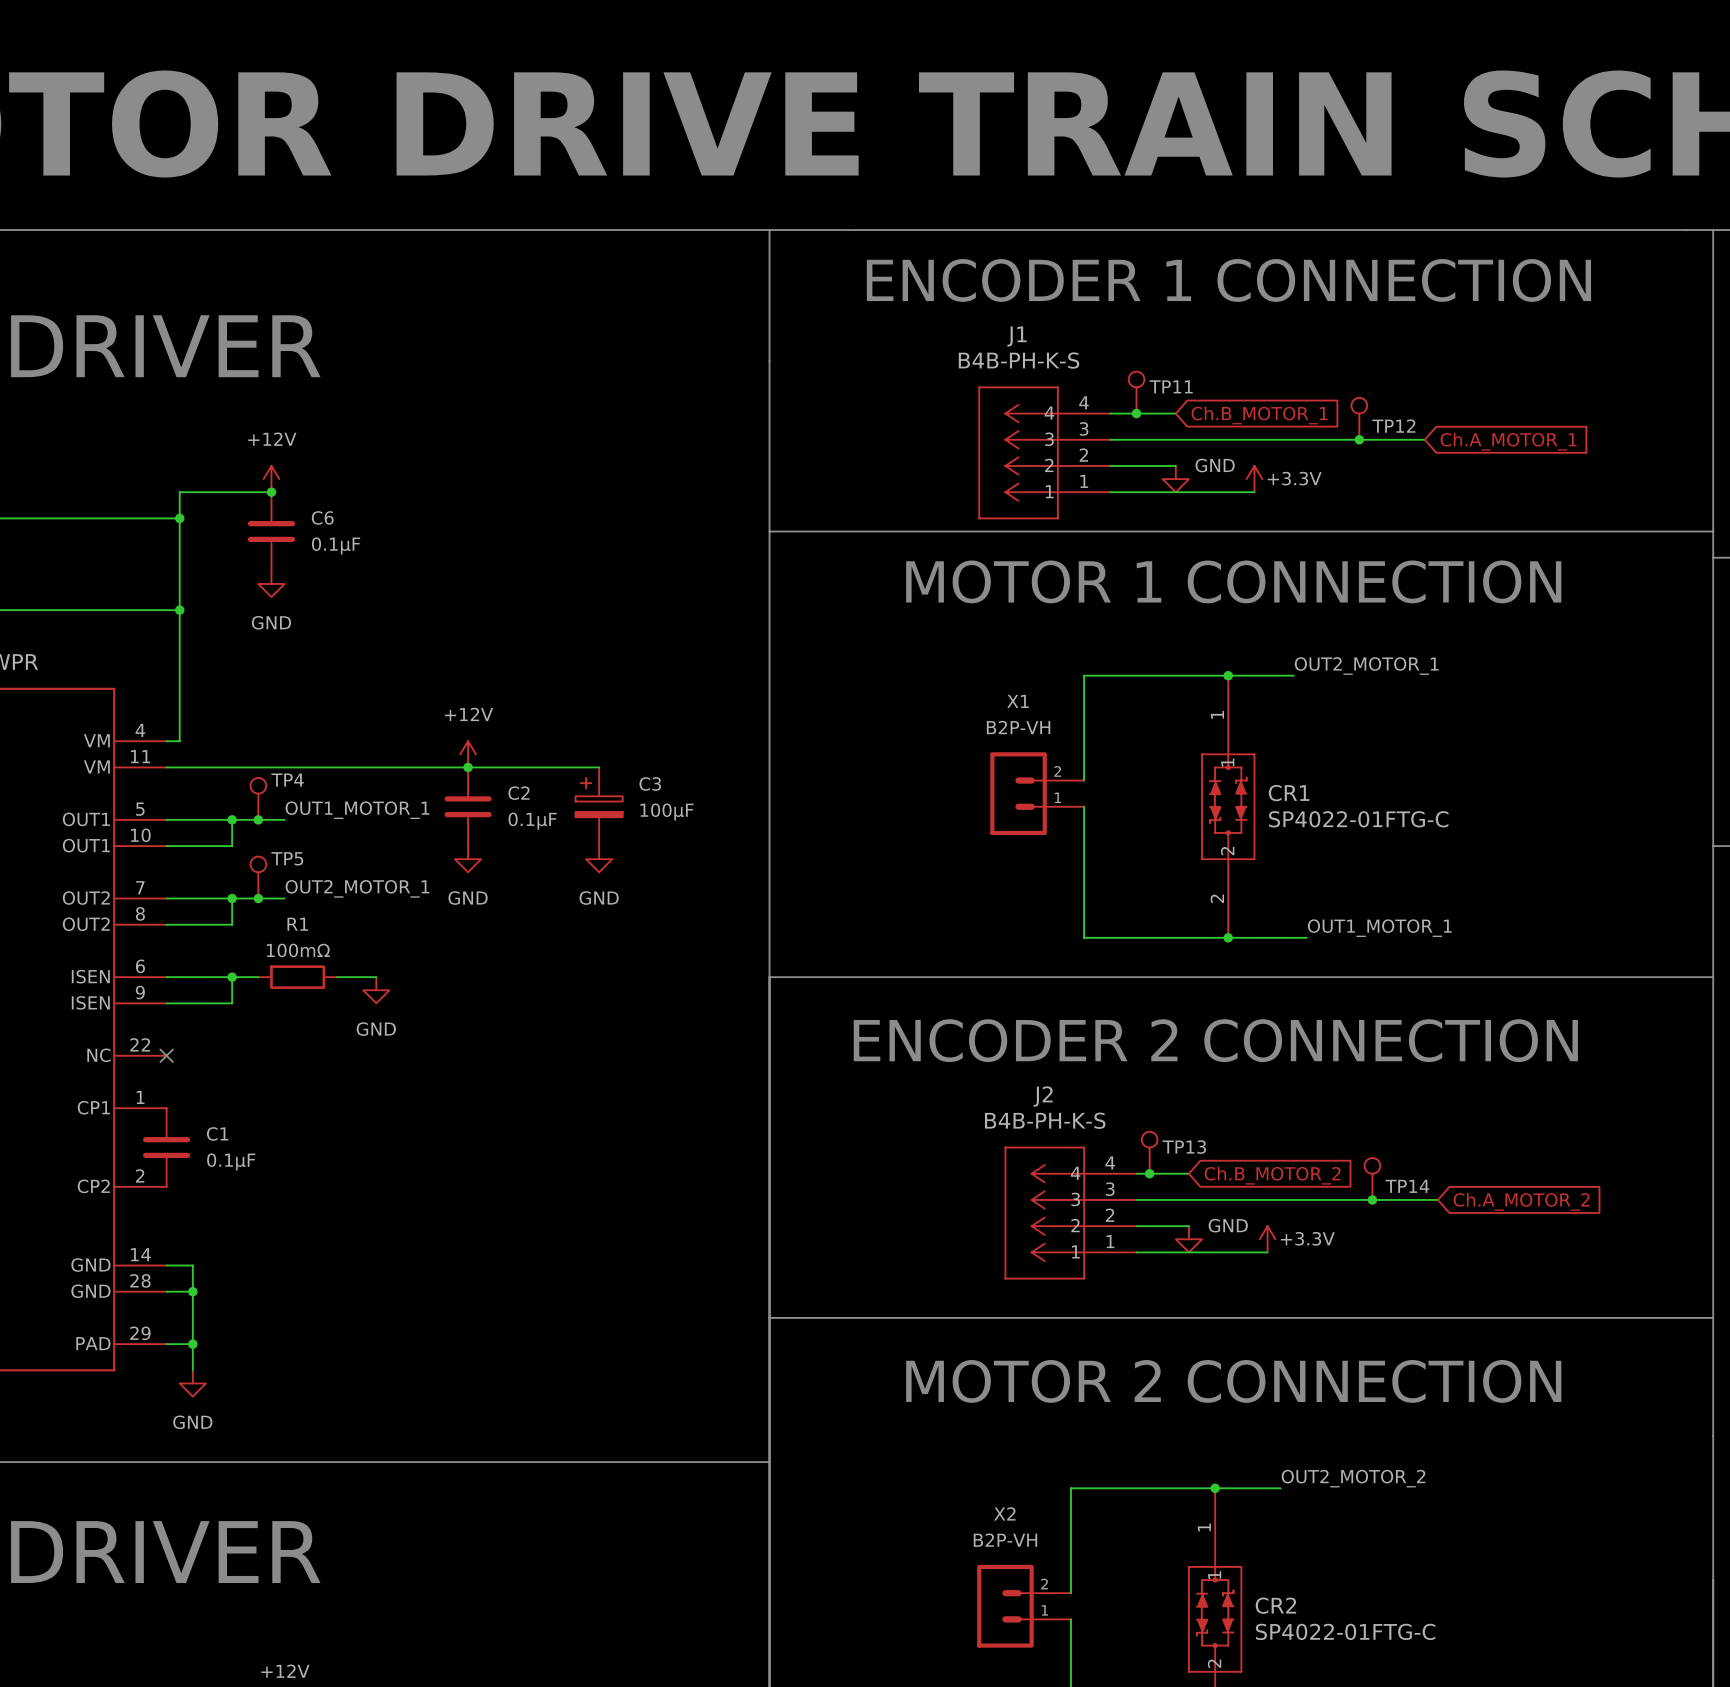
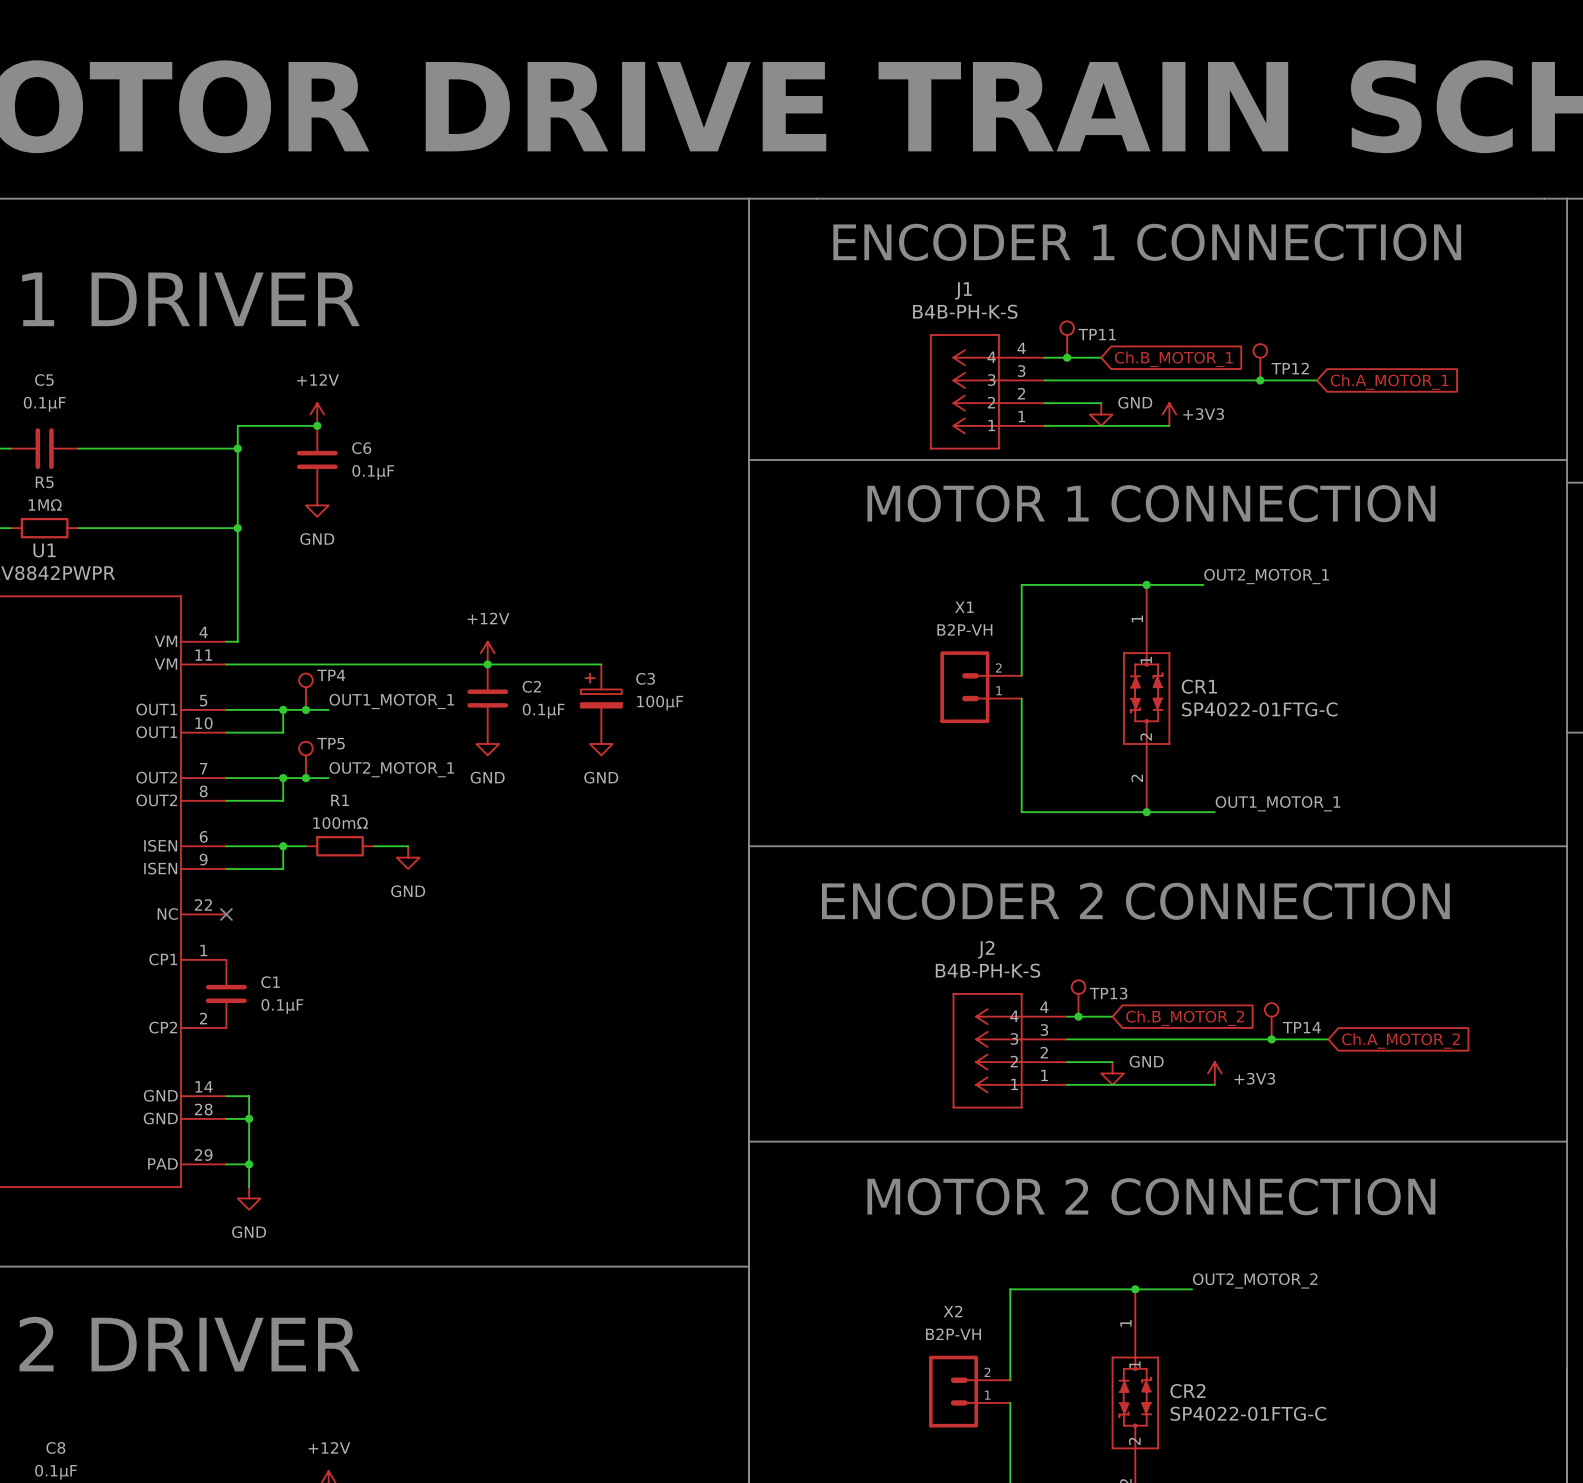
power symbol: +3.3V (1254, 479) -> +3V3 (1169, 414)
power symbol: +3.3V (1267, 1239) -> none
power symbol: none -> +3V3 (1214, 1073)
wire: none -> (1180, 1084) (1214, 1084)

